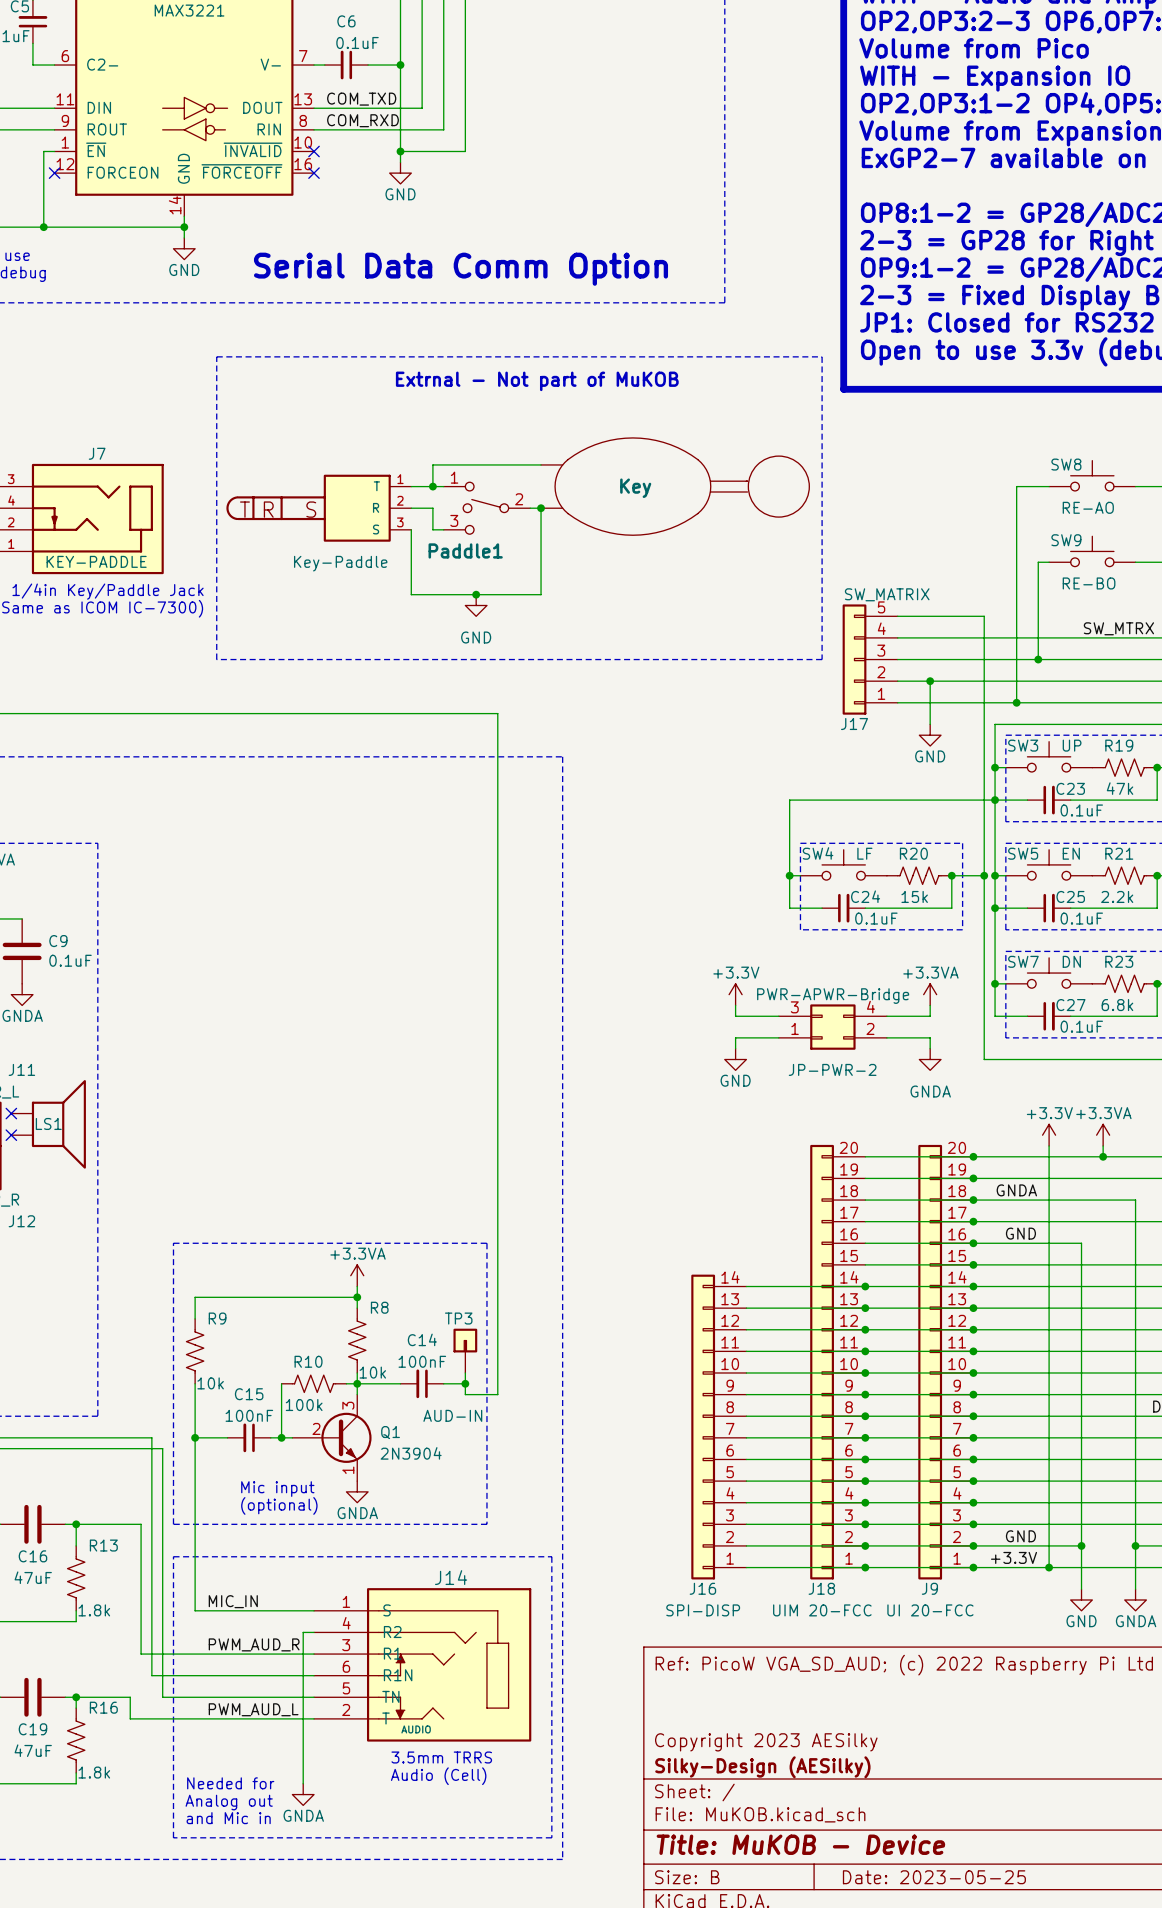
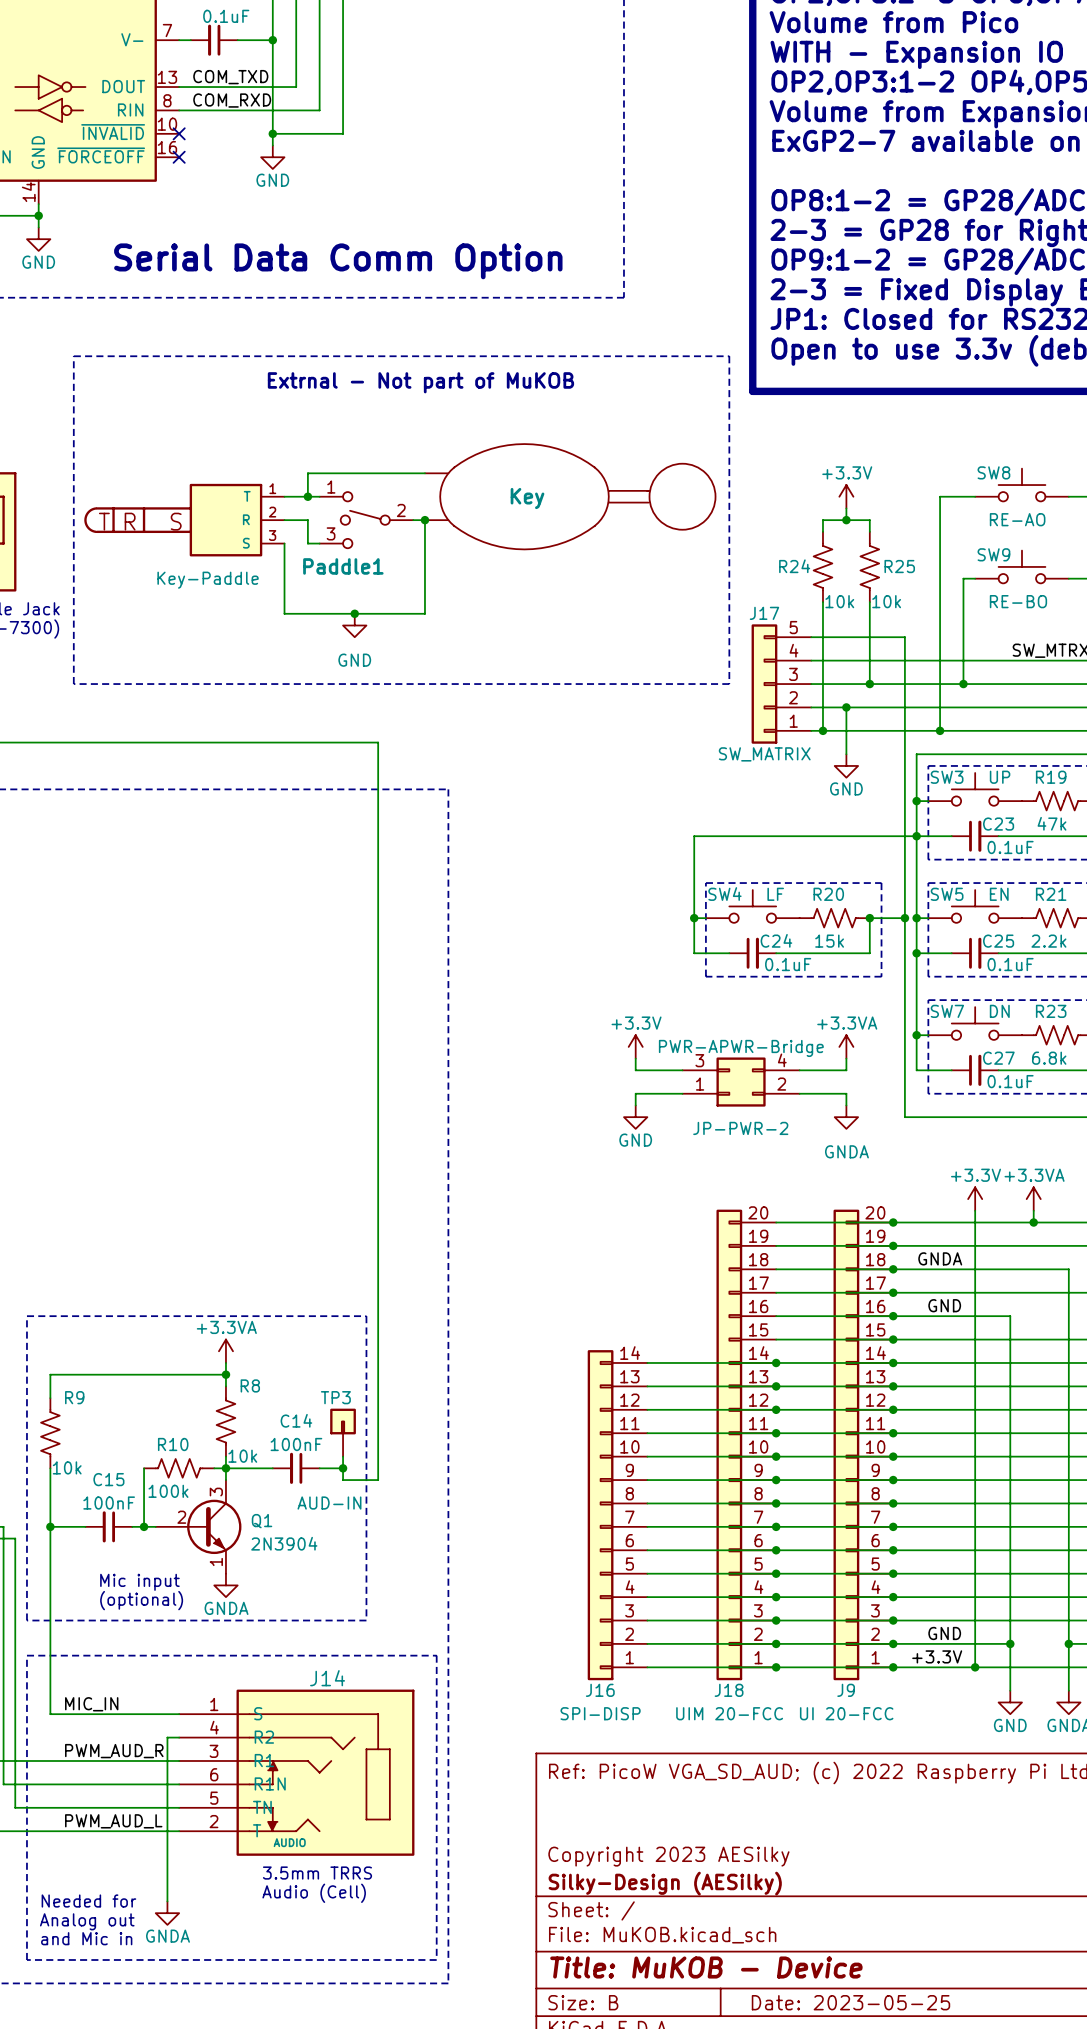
power symbol: none -> +3.3V (846, 496)
wire: none -> (846, 508) (846, 520)
junction: none -> (846, 520)
wire: none -> (822, 531) (822, 520) (869, 520) (869, 531)
R24: none -> 10k (822, 566)
R25: none -> 10k (869, 566)
wire: none -> (822, 602) (822, 730)
wire: none -> (869, 602) (869, 684)
J17 value position: SW_MATRIX (887, 594) -> SW_MATRIX (764, 754)
junction: none -> (869, 684)
junction: none -> (822, 730)
J17 name position: J17 (854, 724) -> J17 (764, 613)

